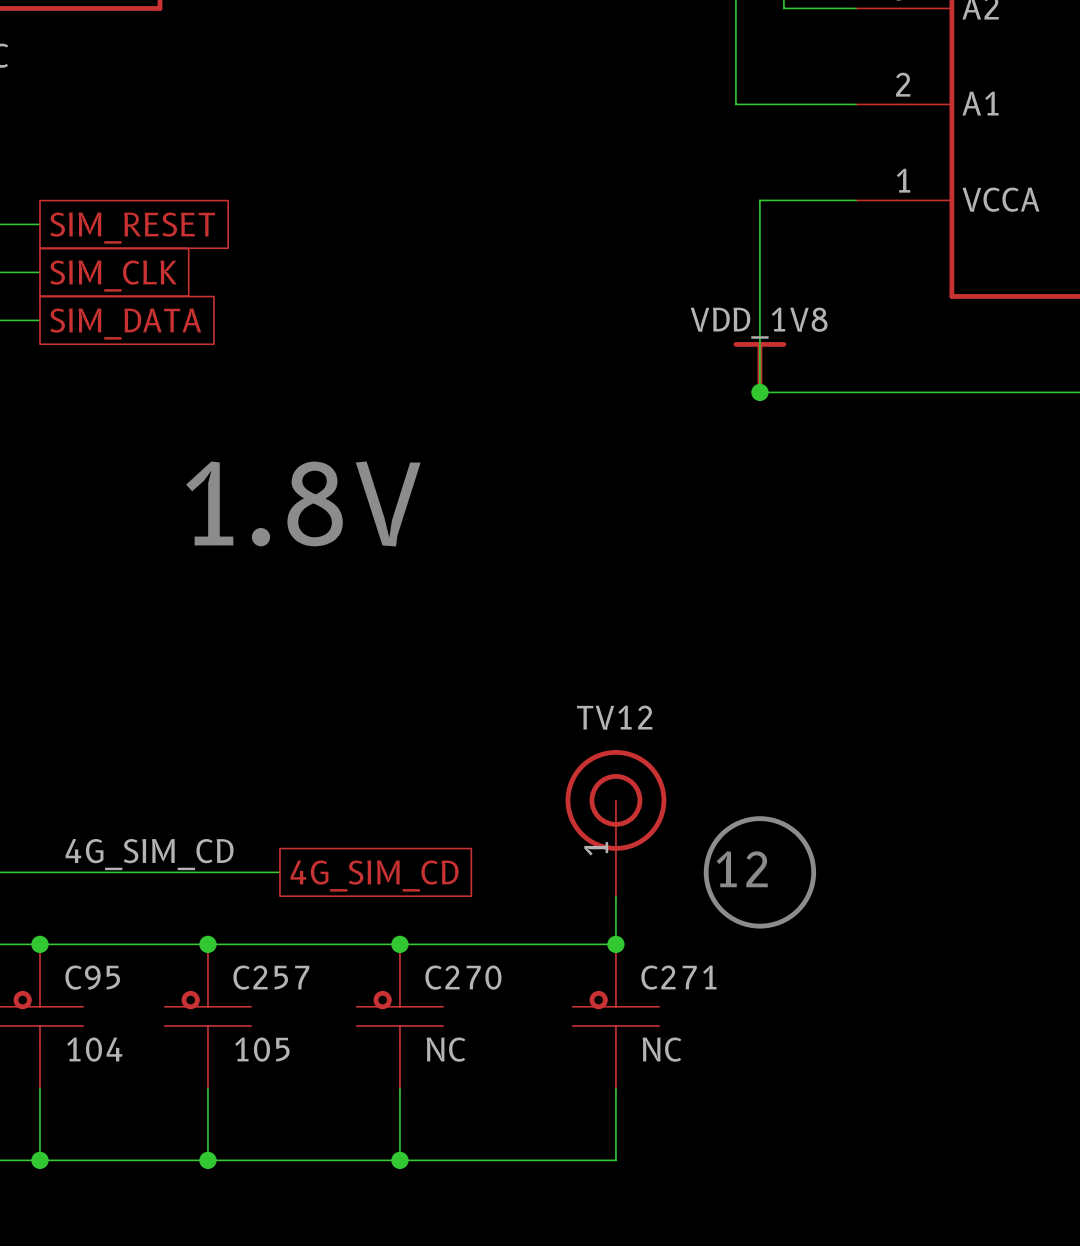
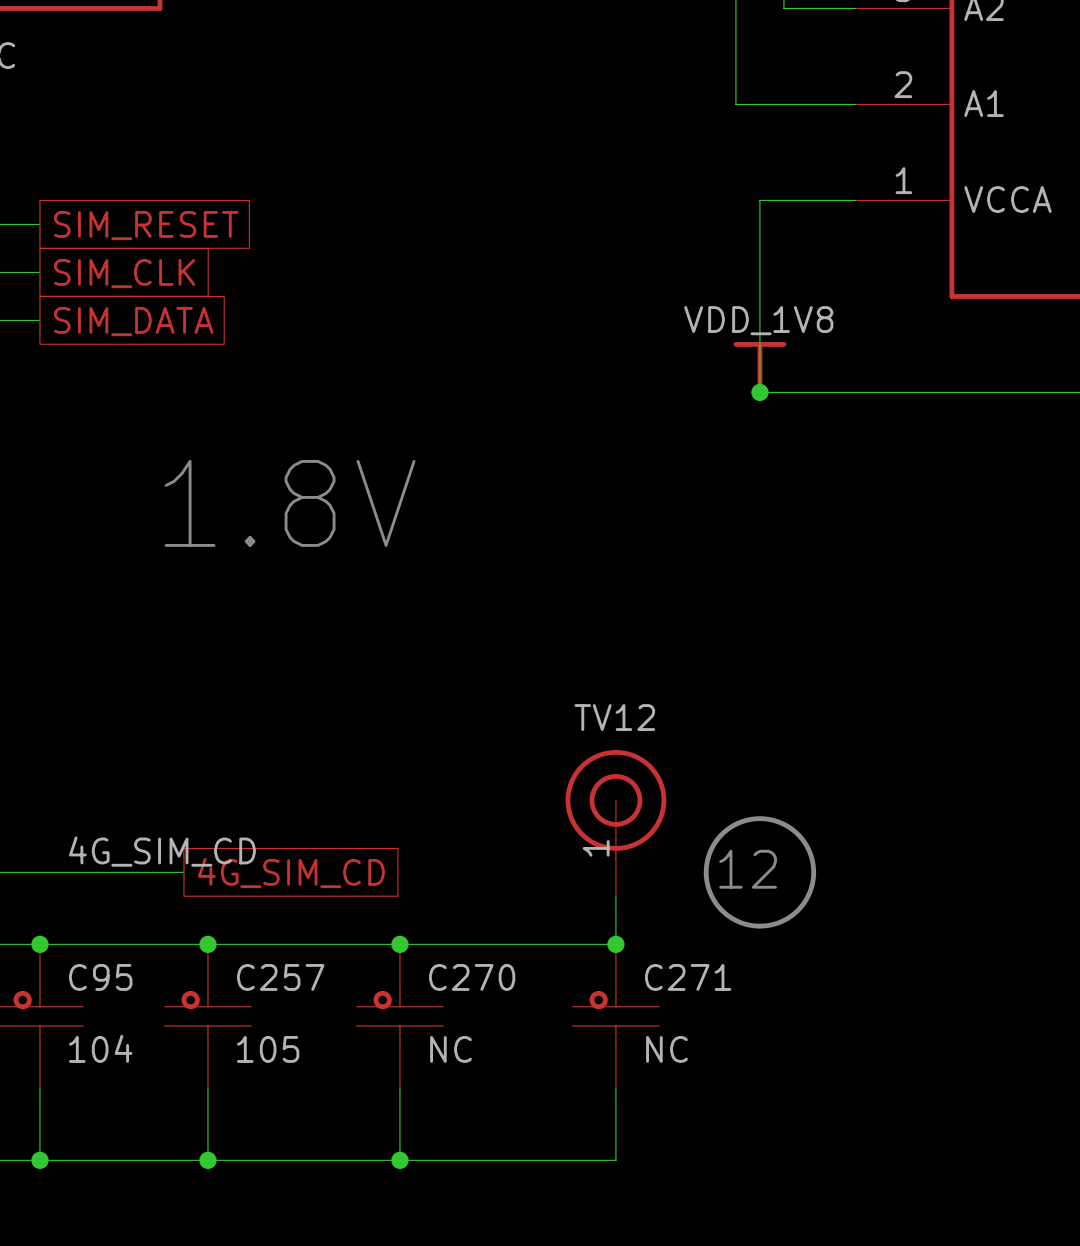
wire: (183, 872) (279, 872) -> none
global label position: 4G_SIM_CD (374, 875) -> 4G_SIM_CD (291, 872)

